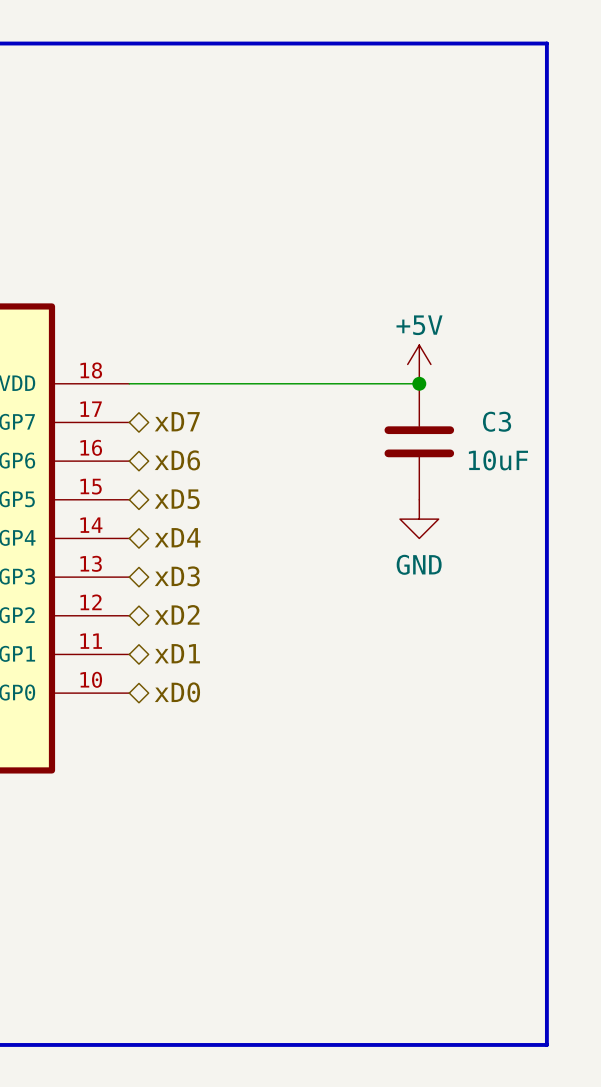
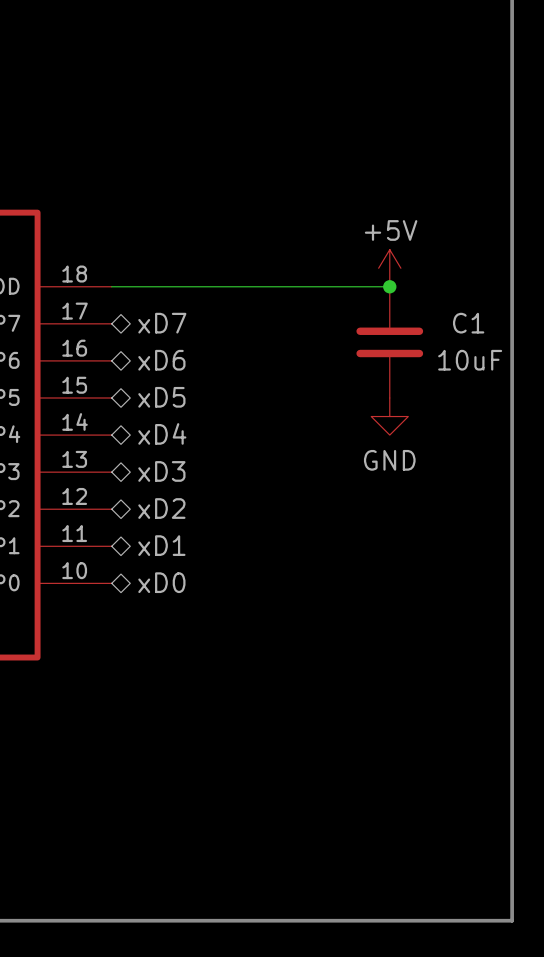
C3 name: C3 (497, 421) -> C1 (468, 323)

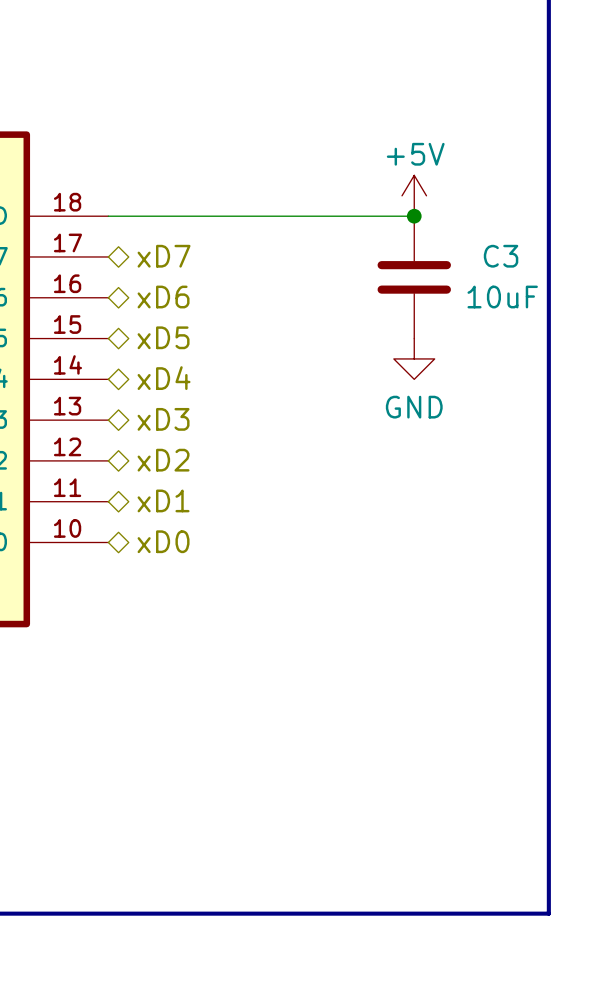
C1 name: C1 (468, 323) -> C3 (501, 256)

